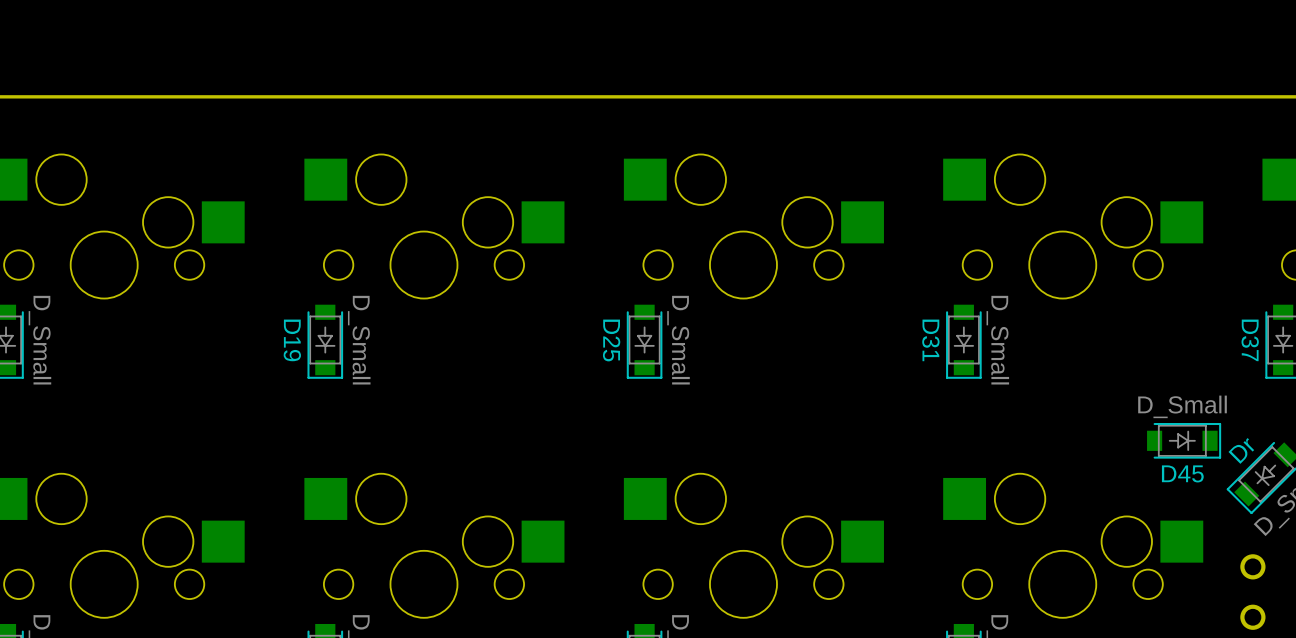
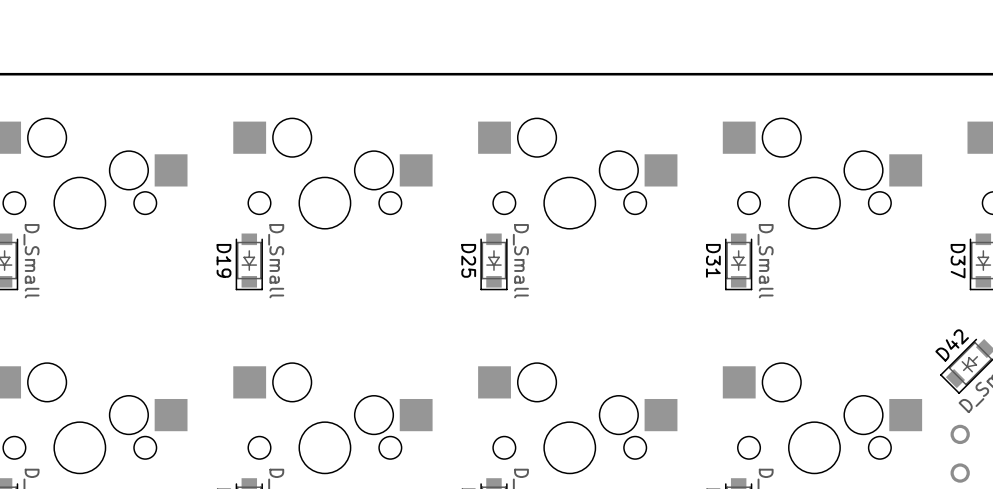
D45: D_Small (1184, 440) -> none
Dr name: Dr (1241, 450) -> D42 (952, 345)

